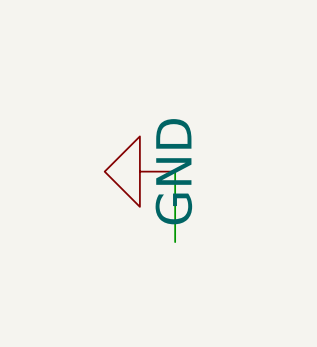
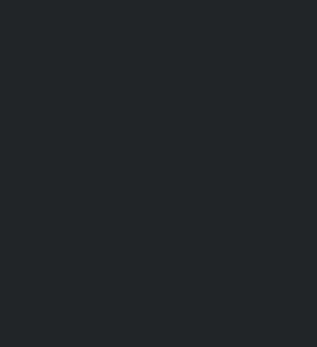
power symbol: GND (139, 171) -> none
wire: (175, 171) (175, 242) -> none

